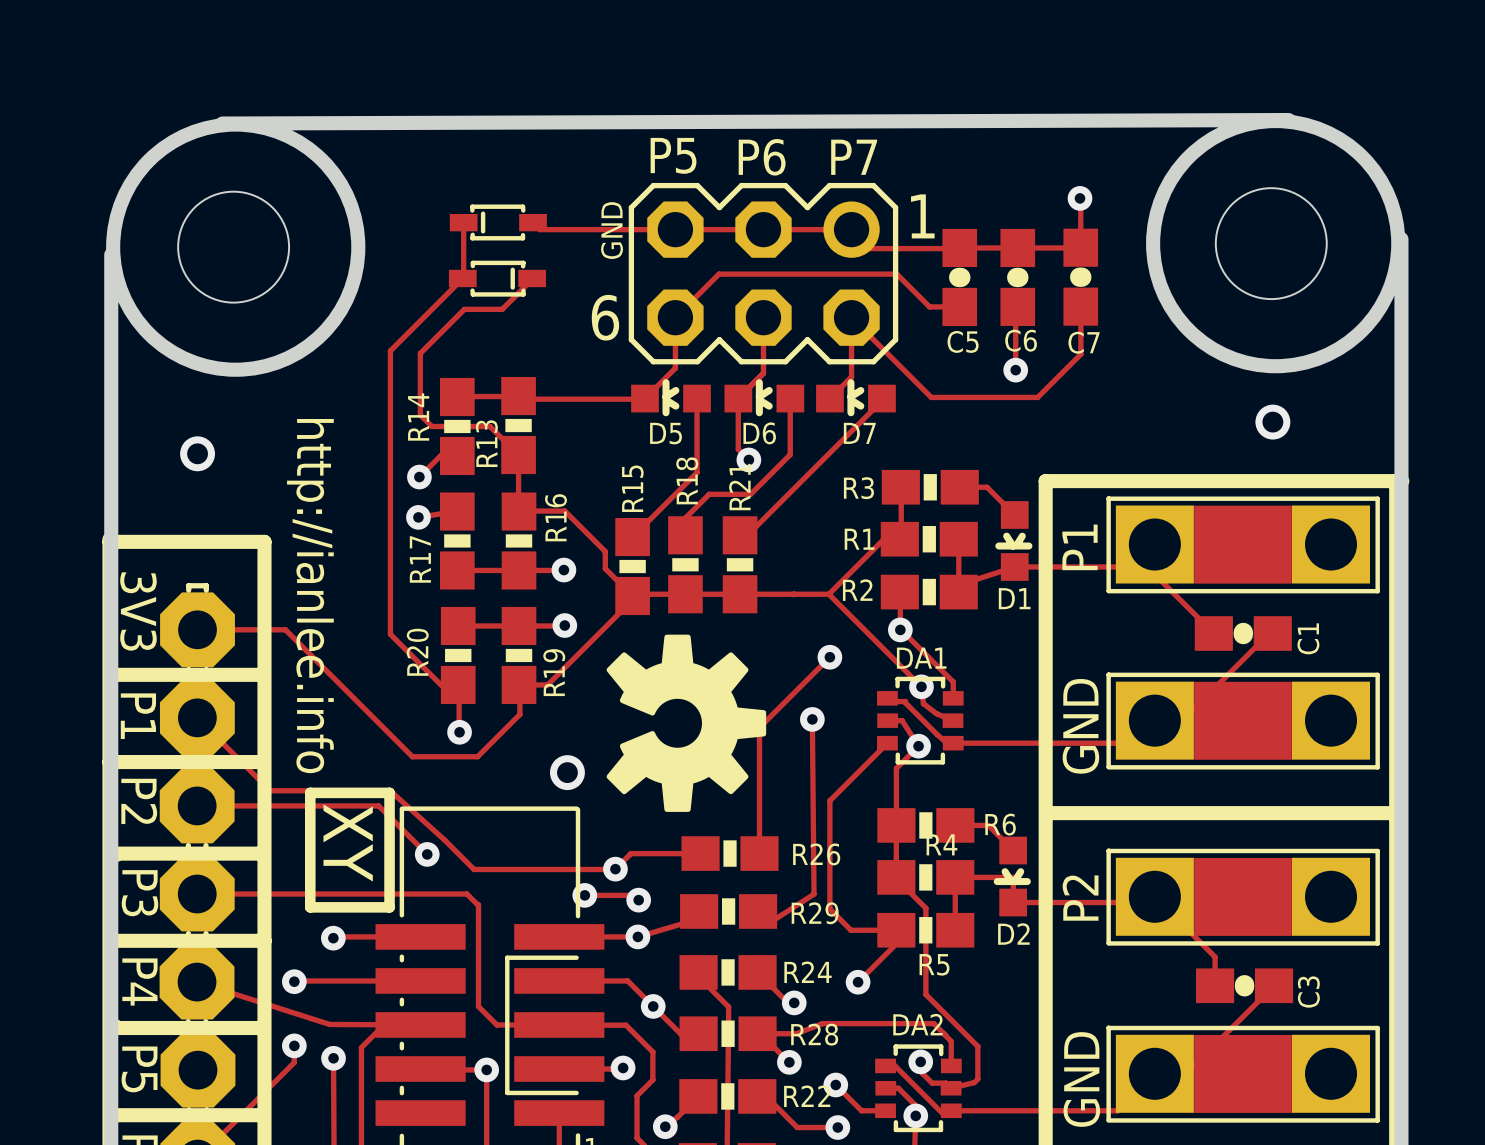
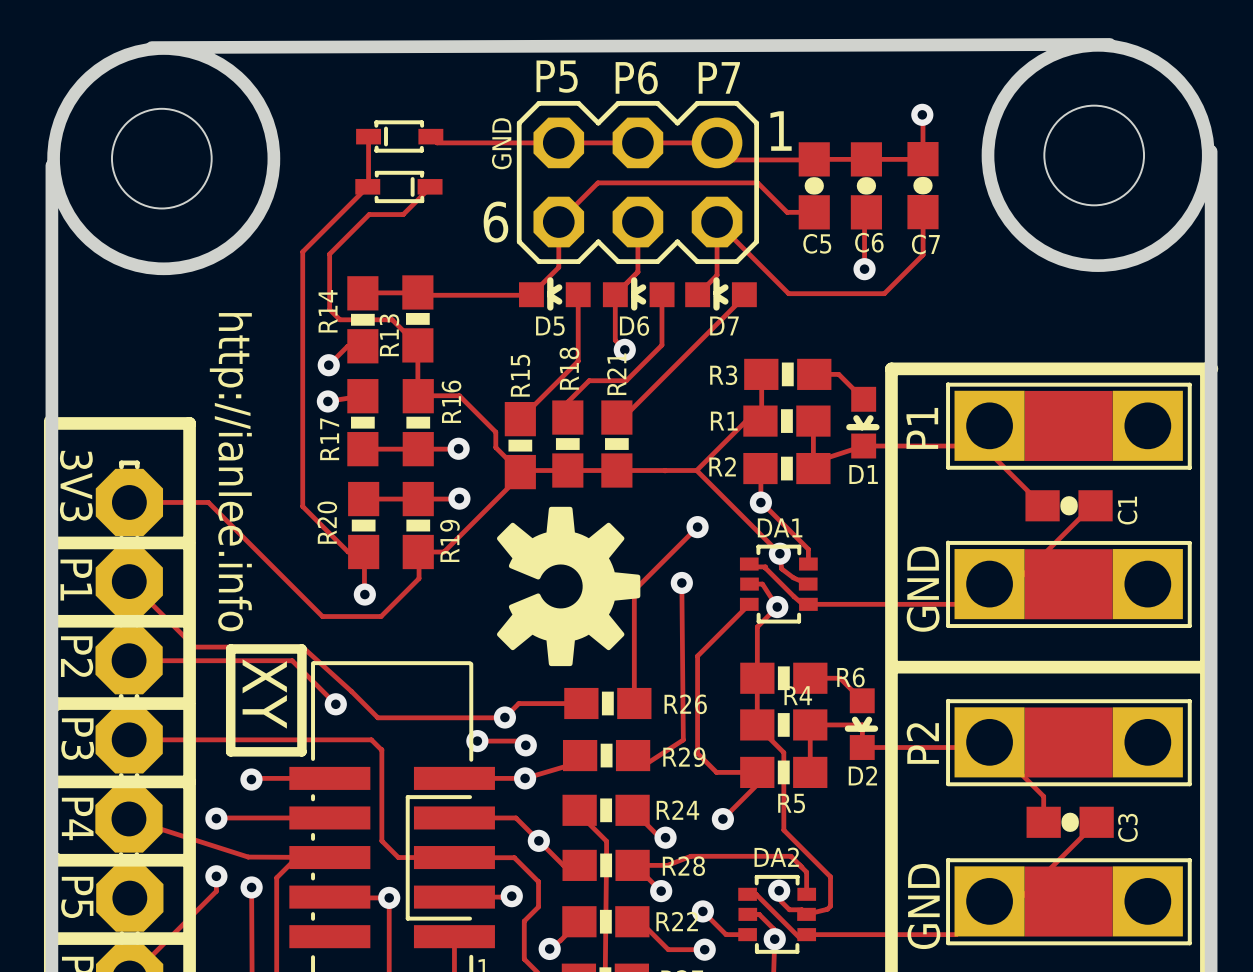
via: (1272, 422) -> none
via: (197, 453) -> none
via: (567, 772) -> none

